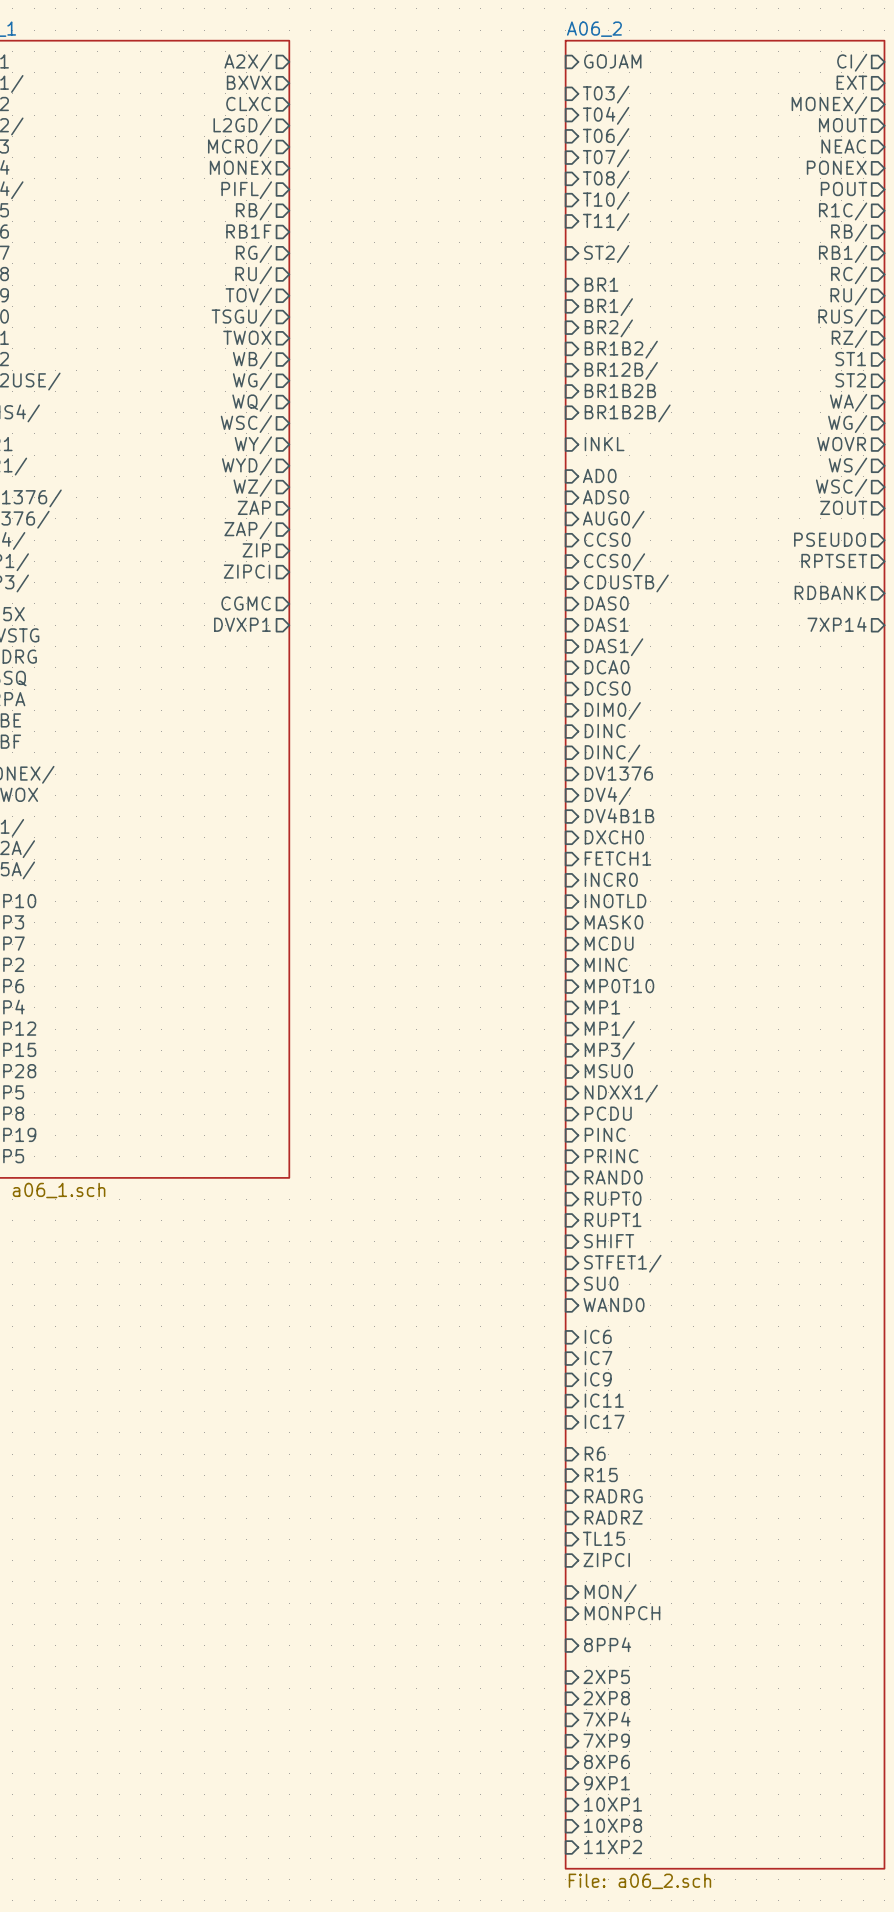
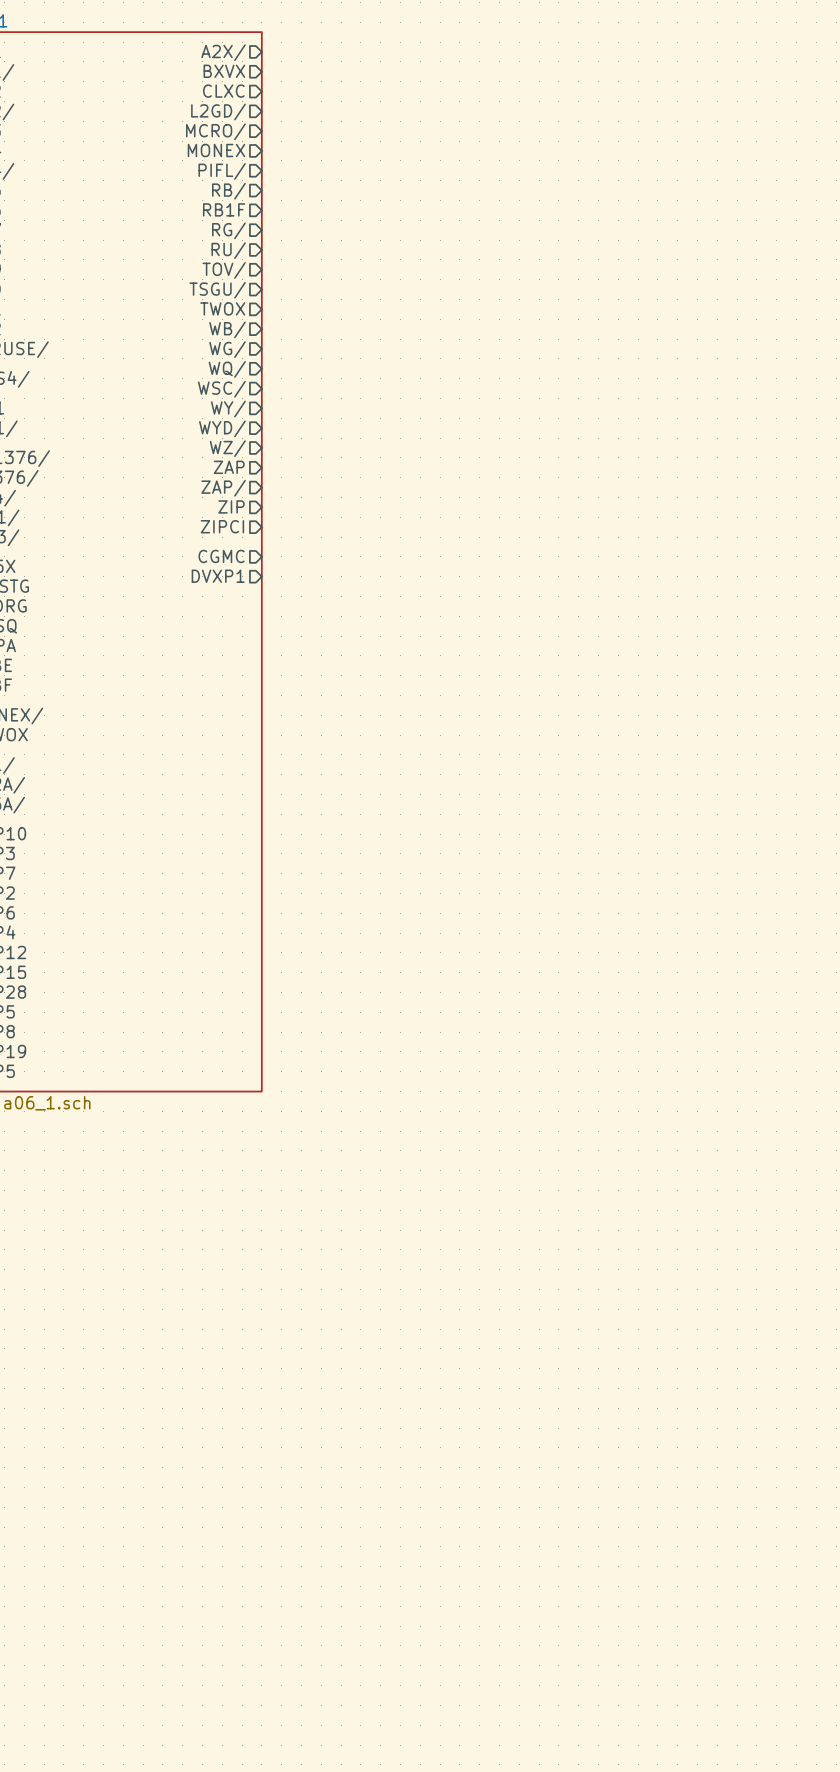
sheet pin: GOJAM (612, 61) -> none
sheet pin: CI/ (852, 62) -> none
sheet pin: EXT (851, 82) -> none
sheet pin: T03/ (606, 94) -> none
sheet pin: MONEX/ (829, 105) -> none
sheet pin: T04/ (606, 115) -> none
sheet pin: MOUT (843, 125) -> none
sheet pin: T06/ (606, 137) -> none
sheet pin: NEAC (843, 146) -> none
sheet pin: T07/ (606, 158) -> none
sheet pin: PONEX (836, 167) -> none
sheet pin: T08/ (606, 179) -> none
sheet pin: POUT (844, 189) -> none
sheet pin: T10/ (606, 200) -> none
sheet pin: R1C/ (843, 211) -> none
sheet pin: T11/ (606, 222) -> none
sheet pin: RB/ (849, 232) -> none
sheet pin: ST2/ (606, 253) -> none
sheet pin: RB1/ (843, 253) -> none
sheet pin: RC/ (849, 275) -> none
sheet pin: BR1 (601, 284) -> none
sheet pin: RU/ (848, 296) -> none
sheet pin: BR1/ (608, 307) -> none
sheet pin: RUS/ (842, 317) -> none
sheet pin: BR2/ (608, 328) -> none
sheet pin: RZ/ (849, 339) -> none
sheet pin: BR1B2/ (621, 349) -> none
sheet pin: ST1 (850, 359) -> none
sheet pin: BR12B/ (621, 370) -> none
sheet pin: ST2 (850, 380) -> none
sheet pin: BR1B2B (620, 390) -> none
sheet pin: WA/ (848, 402) -> none
sheet pin: BR1B2B/ (627, 413) -> none
sheet pin: WG/ (847, 424) -> none
sheet pin: INKL (604, 444) -> none
sheet pin: WOVR (841, 444) -> none
sheet pin: WS/ (847, 466) -> none
sheet pin: AD0 (599, 475) -> none
sheet pin: WSC/ (841, 487) -> none
sheet pin: ADS0 (605, 497) -> none
sheet pin: ZOUT (843, 507) -> none
sheet pin: AUG0/ (613, 519) -> none
sheet pin: CCS0 (607, 539) -> none
sheet pin: PSEUDO (830, 539) -> none
sheet pin: RPTSET (834, 560) -> none
sheet pin: CCS0/ (614, 562) -> none
sheet pin: CDUSTB/ (626, 583) -> none
sheet pin: RDBANK (830, 592) -> none
sheet pin: DAS0 (606, 603) -> none
sheet pin: DAS1 (606, 624) -> none
sheet pin: 7XP14 (837, 624) -> none
sheet pin: DAS1/ (613, 647) -> none
sheet pin: DCA0 (607, 667) -> none
sheet pin: DCS0 (607, 688) -> none
sheet pin: DIM0/ (612, 711) -> none
sheet pin: DINC (605, 731) -> none
sheet pin: DINC/ (612, 753) -> none
sheet pin: DV1376 (618, 773) -> none
sheet pin: DV4/ (607, 796) -> none
sheet pin: DV4B1B (619, 815) -> none
sheet pin: DXCH0 (614, 837) -> none
sheet pin: FETCH1 (617, 858) -> none
sheet pin: INCR0 (611, 879) -> none
sheet pin: INOTLD (615, 901) -> none
sheet pin: MASK0 (613, 922) -> none
sheet pin: MCDU (609, 943) -> none
sheet A06_2: File: a06_2.sch (725, 954) -> none
sheet pin: MINC (606, 964) -> none
sheet pin: MP0T10 (619, 986) -> none
sheet pin: MP1 (602, 1007) -> none
sheet pin: MP1/ (609, 1029) -> none
sheet pin: MP3/ (609, 1051) -> none
sheet pin: MSU0 (608, 1071) -> none
sheet pin: NDXX1/ (621, 1093) -> none
sheet pin: PCDU (608, 1113) -> none
sheet pin: PINC (605, 1134) -> none
sheet pin: PRINC (611, 1156) -> none
sheet pin: RAND0 (613, 1177) -> none
sheet pin: RUPT0 (613, 1198) -> none
sheet pin: RUPT1 (613, 1219) -> none
sheet pin: SHIFT (609, 1241) -> none
sheet pin: STFET1/ (622, 1263) -> none
sheet pin: SU0 (601, 1283) -> none
sheet pin: WAND0 (613, 1304) -> none
sheet pin: IC6 (598, 1336) -> none
sheet pin: IC7 (598, 1358) -> none
sheet pin: IC9 (598, 1379) -> none
sheet pin: IC11 (604, 1400) -> none
sheet pin: IC17 (604, 1421) -> none
sheet pin: R6 (595, 1453) -> none
sheet pin: R15 (601, 1475) -> none
sheet pin: RADRG (613, 1496) -> none
sheet pin: RADRZ (613, 1517) -> none
sheet pin: TL15 (603, 1538) -> none
sheet pin: ZIPCI (606, 1560) -> none
sheet pin: MON/ (610, 1593) -> none
sheet pin: MONPCH (622, 1613) -> none
sheet pin: 8PP4 (607, 1644) -> none
sheet pin: 2XP5 (606, 1676) -> none
sheet pin: 2XP8 (606, 1698) -> none
sheet pin: 7XP4 (607, 1719) -> none
sheet pin: 7XP9 (606, 1740) -> none
sheet pin: 8XP6 (607, 1761) -> none
sheet pin: 9XP1 (607, 1783) -> none
sheet pin: 10XP1 (613, 1804) -> none
sheet pin: 10XP8 (613, 1825) -> none
sheet pin: 11XP2 (613, 1847) -> none

